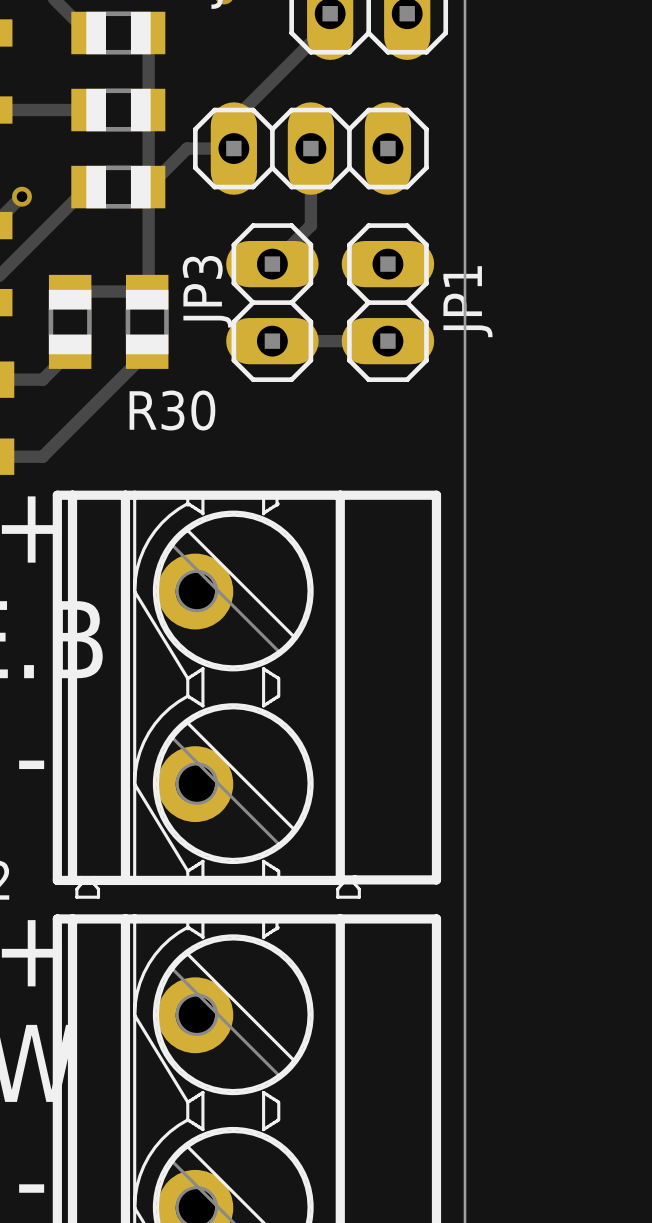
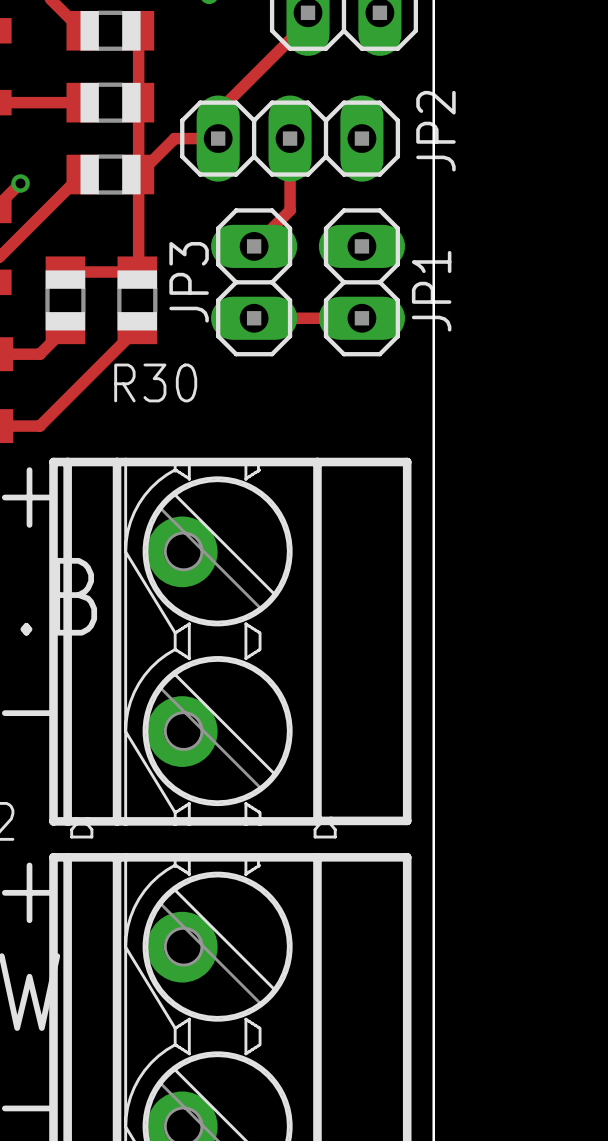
JP2 name: none -> JP2 (435, 131)

